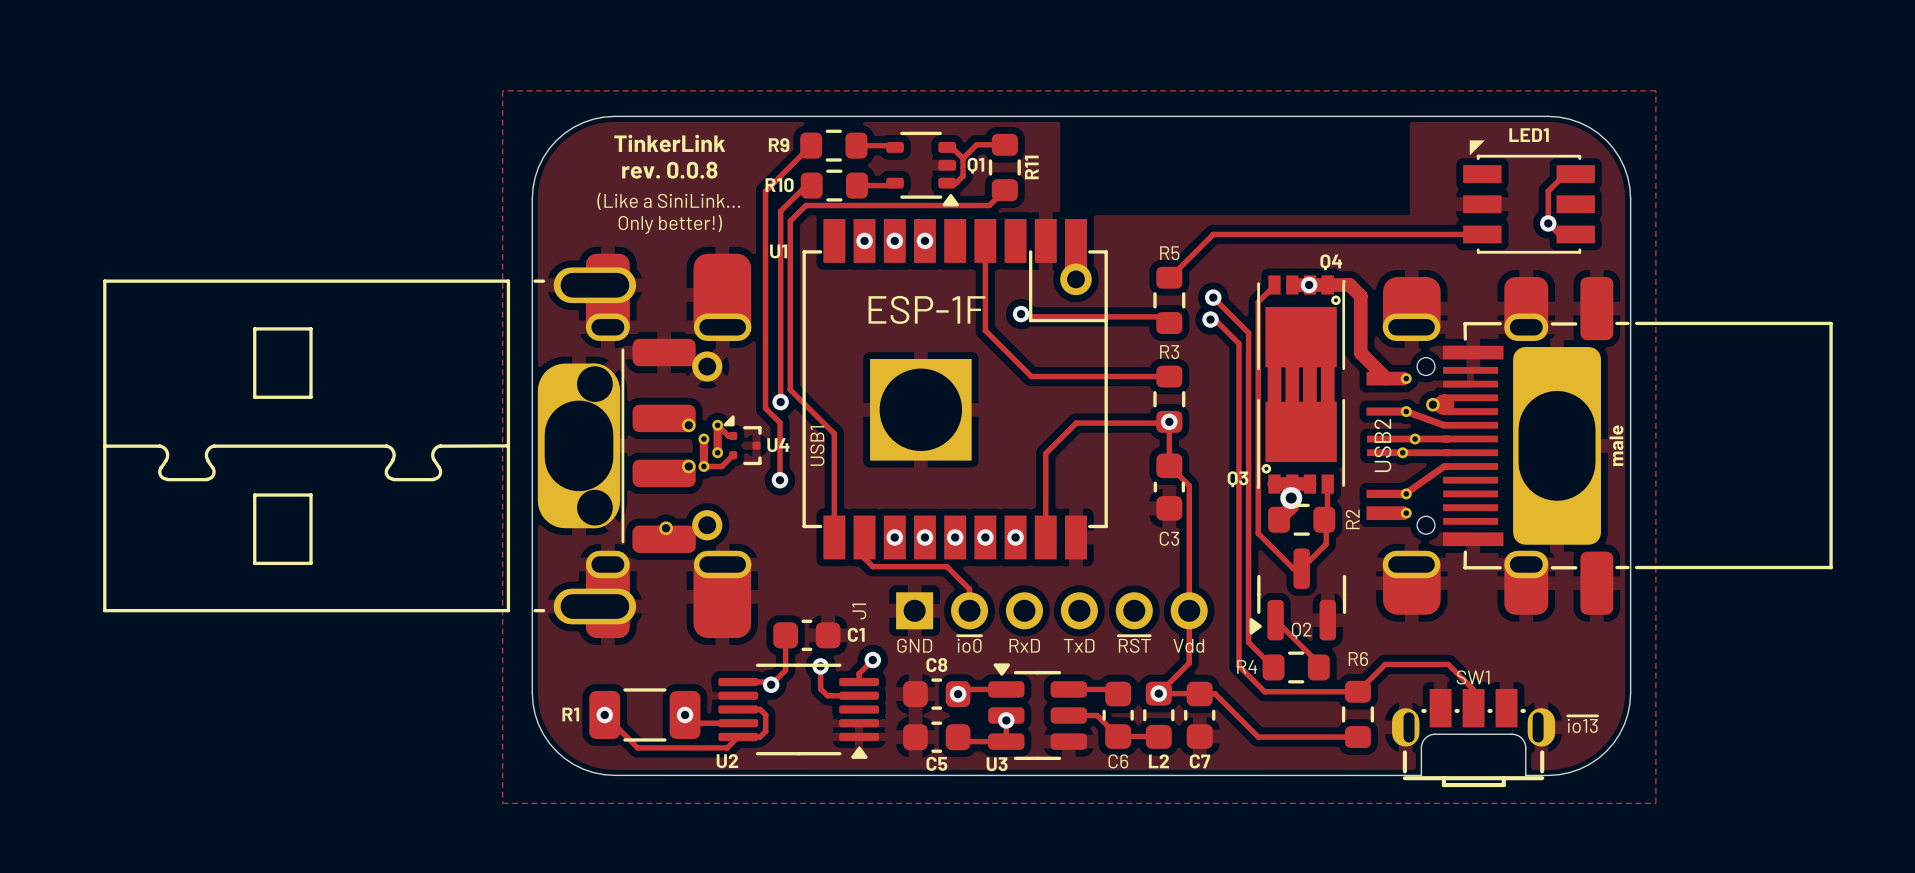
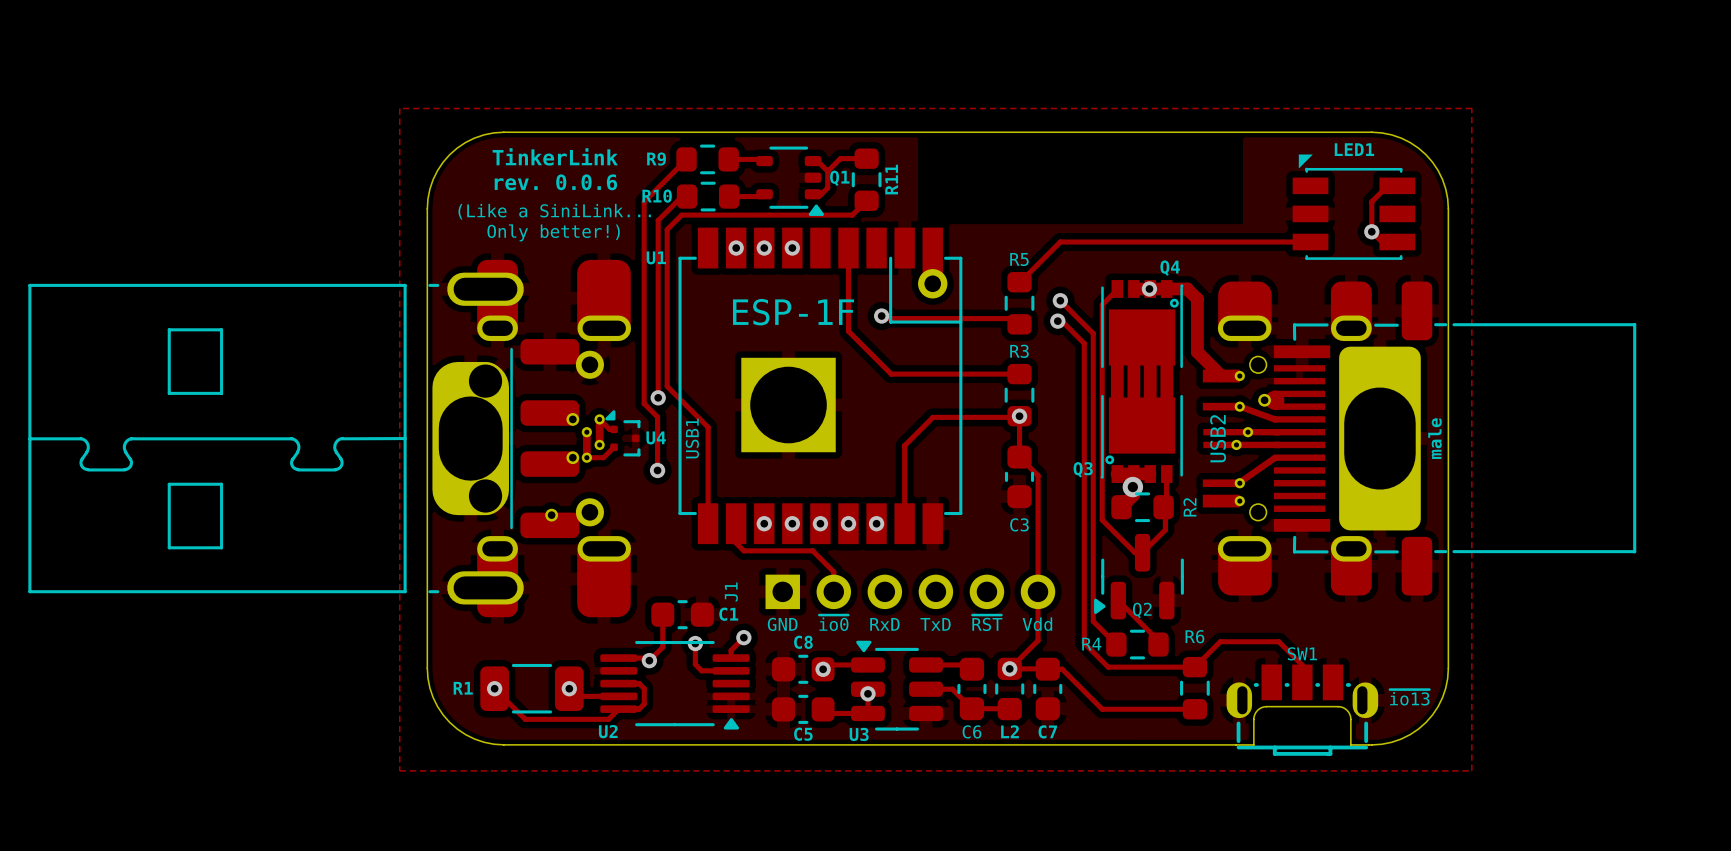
text: rev. 0.0.8 (669, 170) -> rev. 0.0.6 (555, 182)

